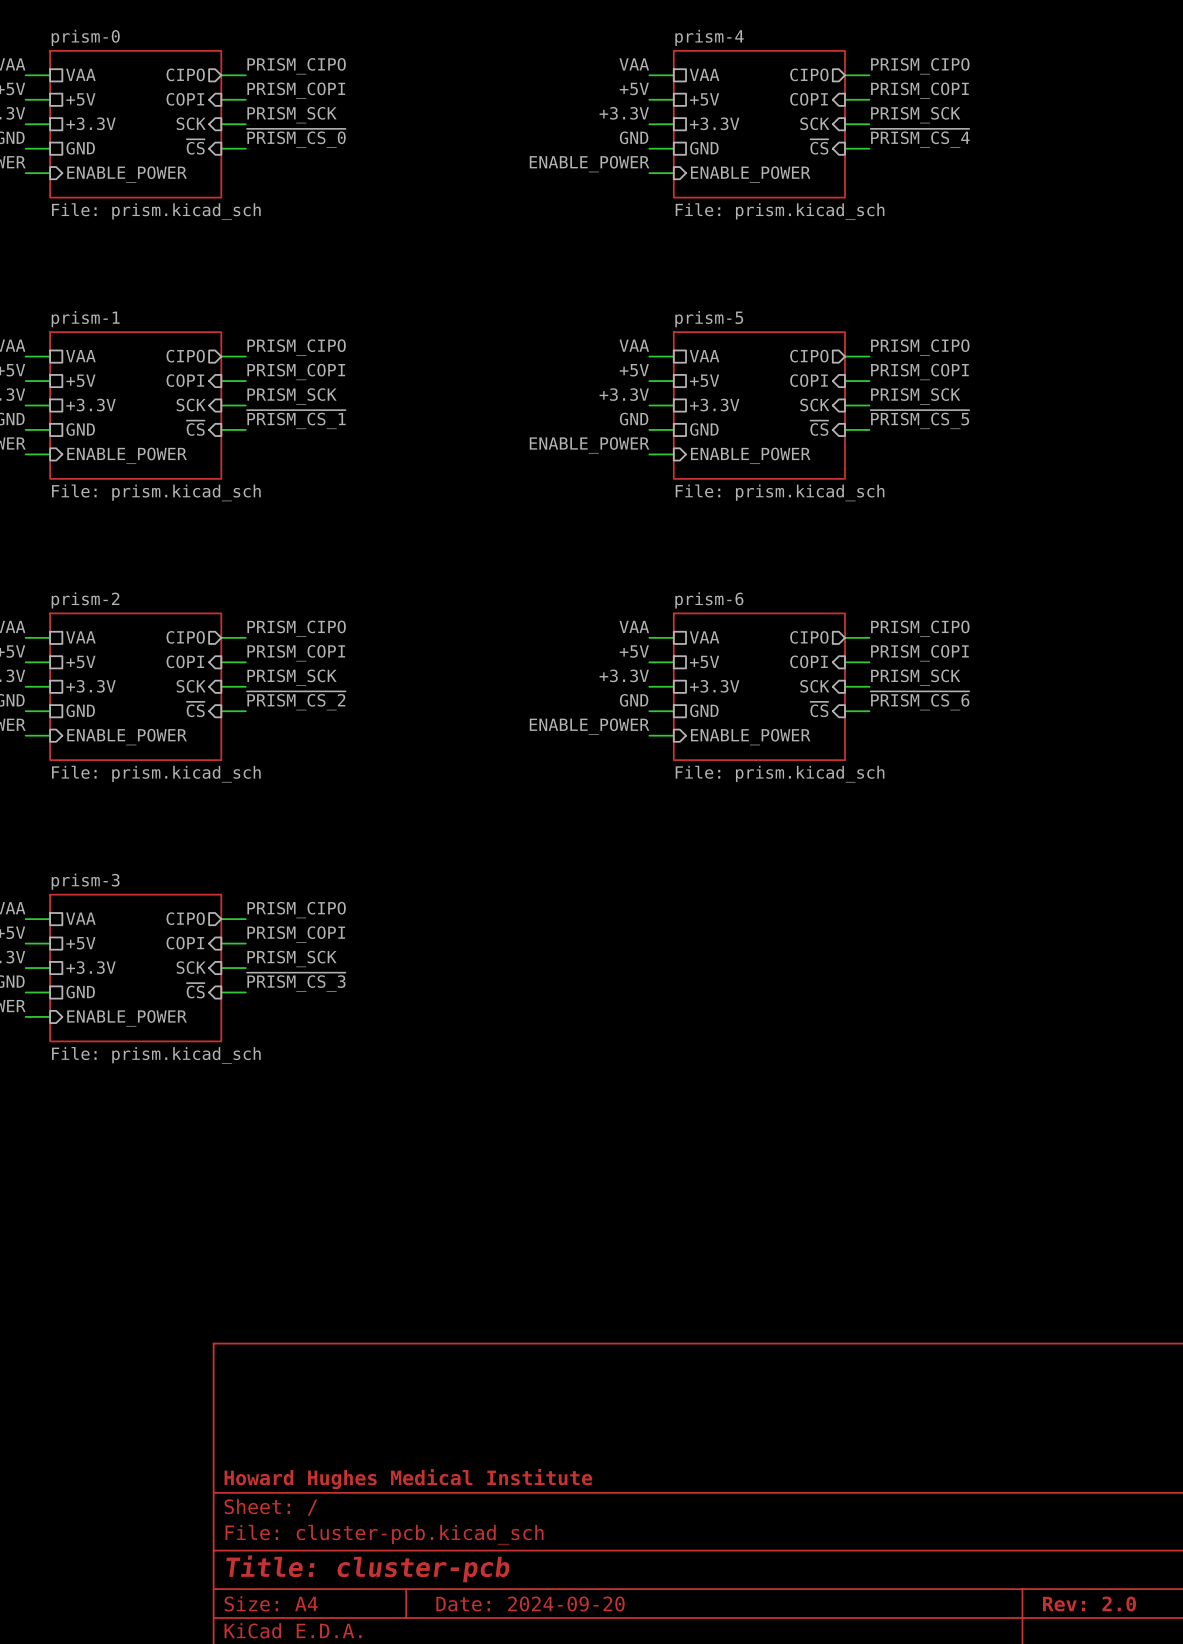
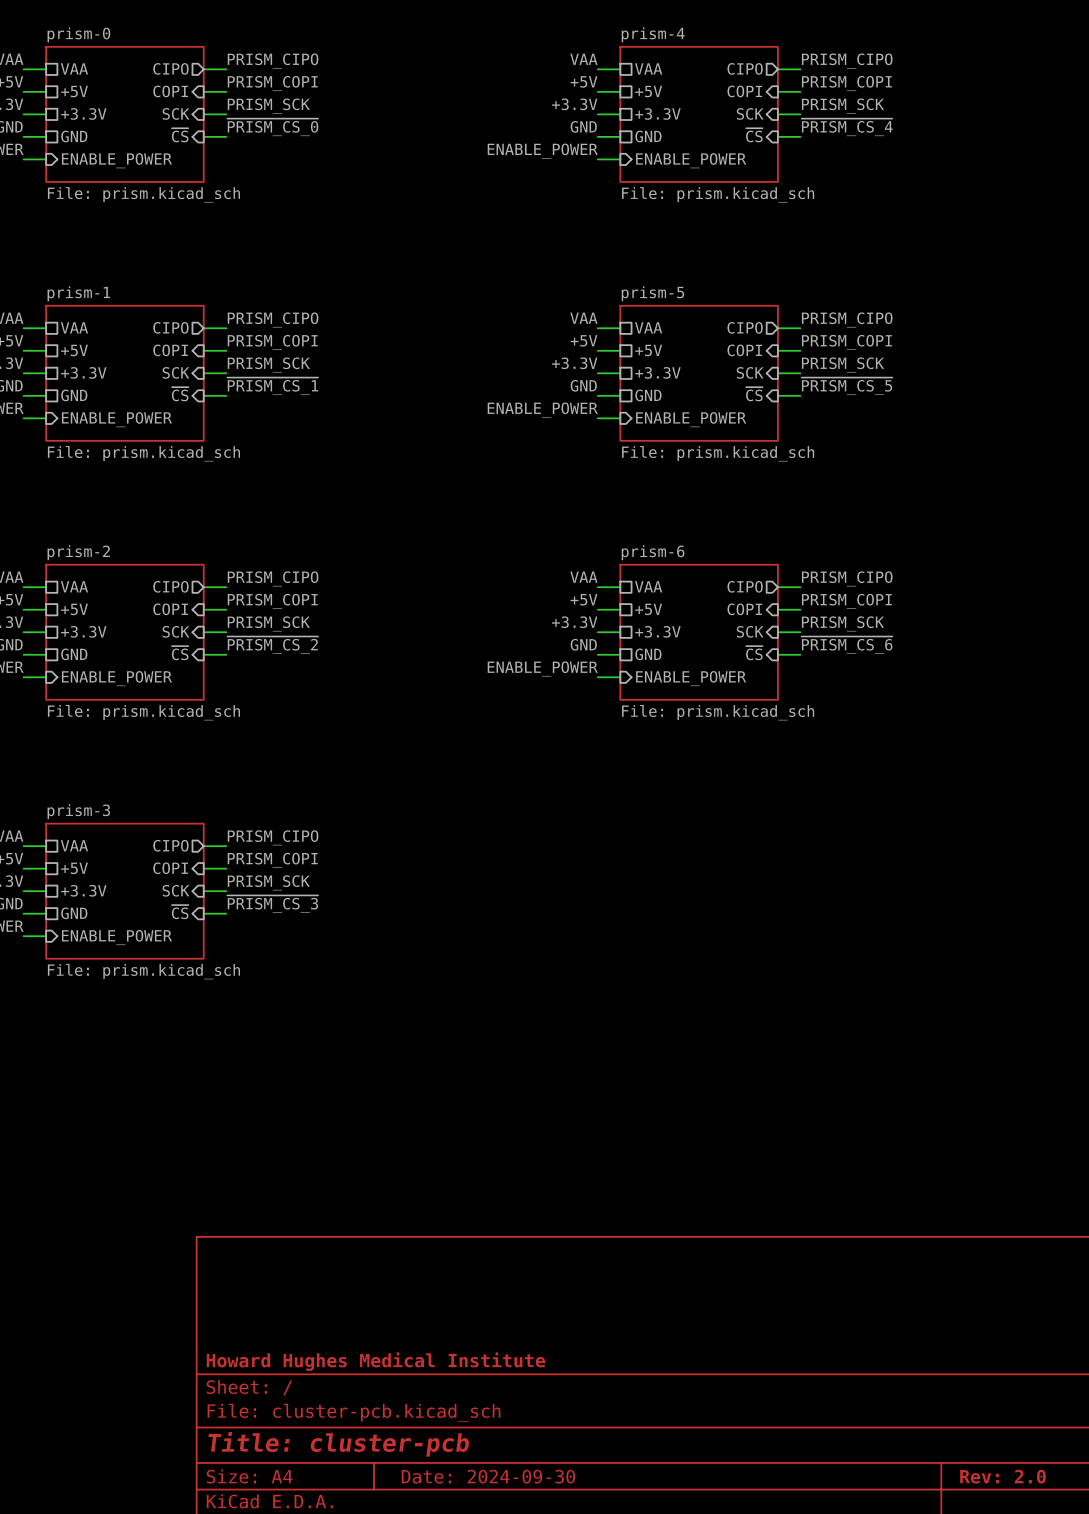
title block: Date: 2024-09-20 (530, 1603) -> Date: 2024-09-30 (488, 1476)

